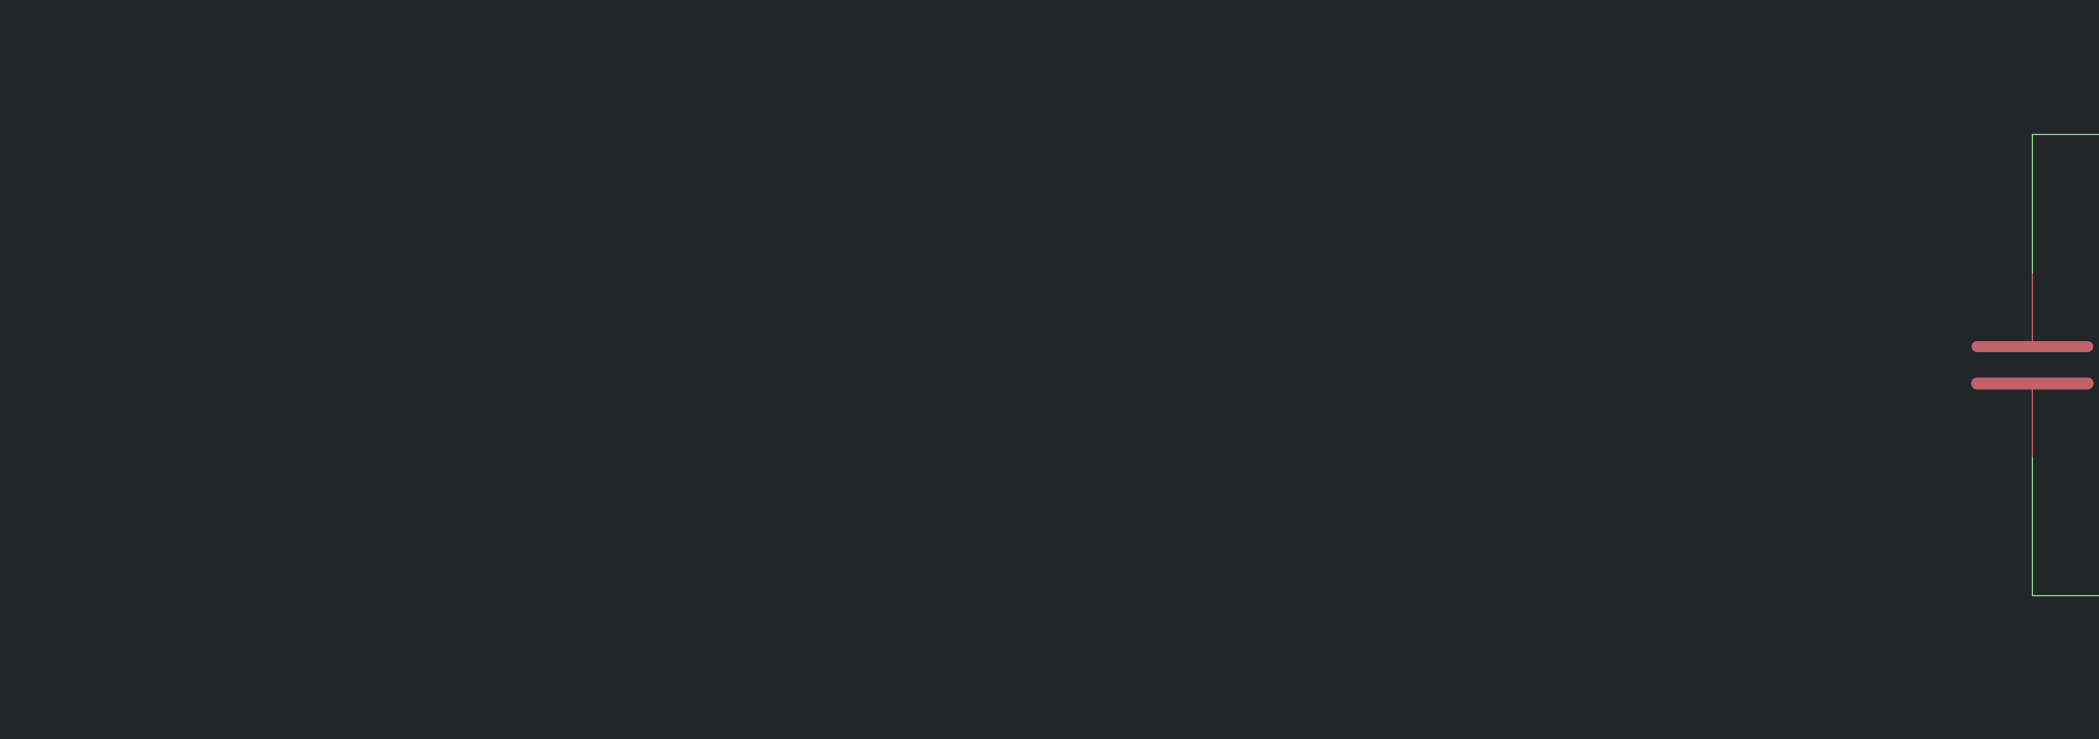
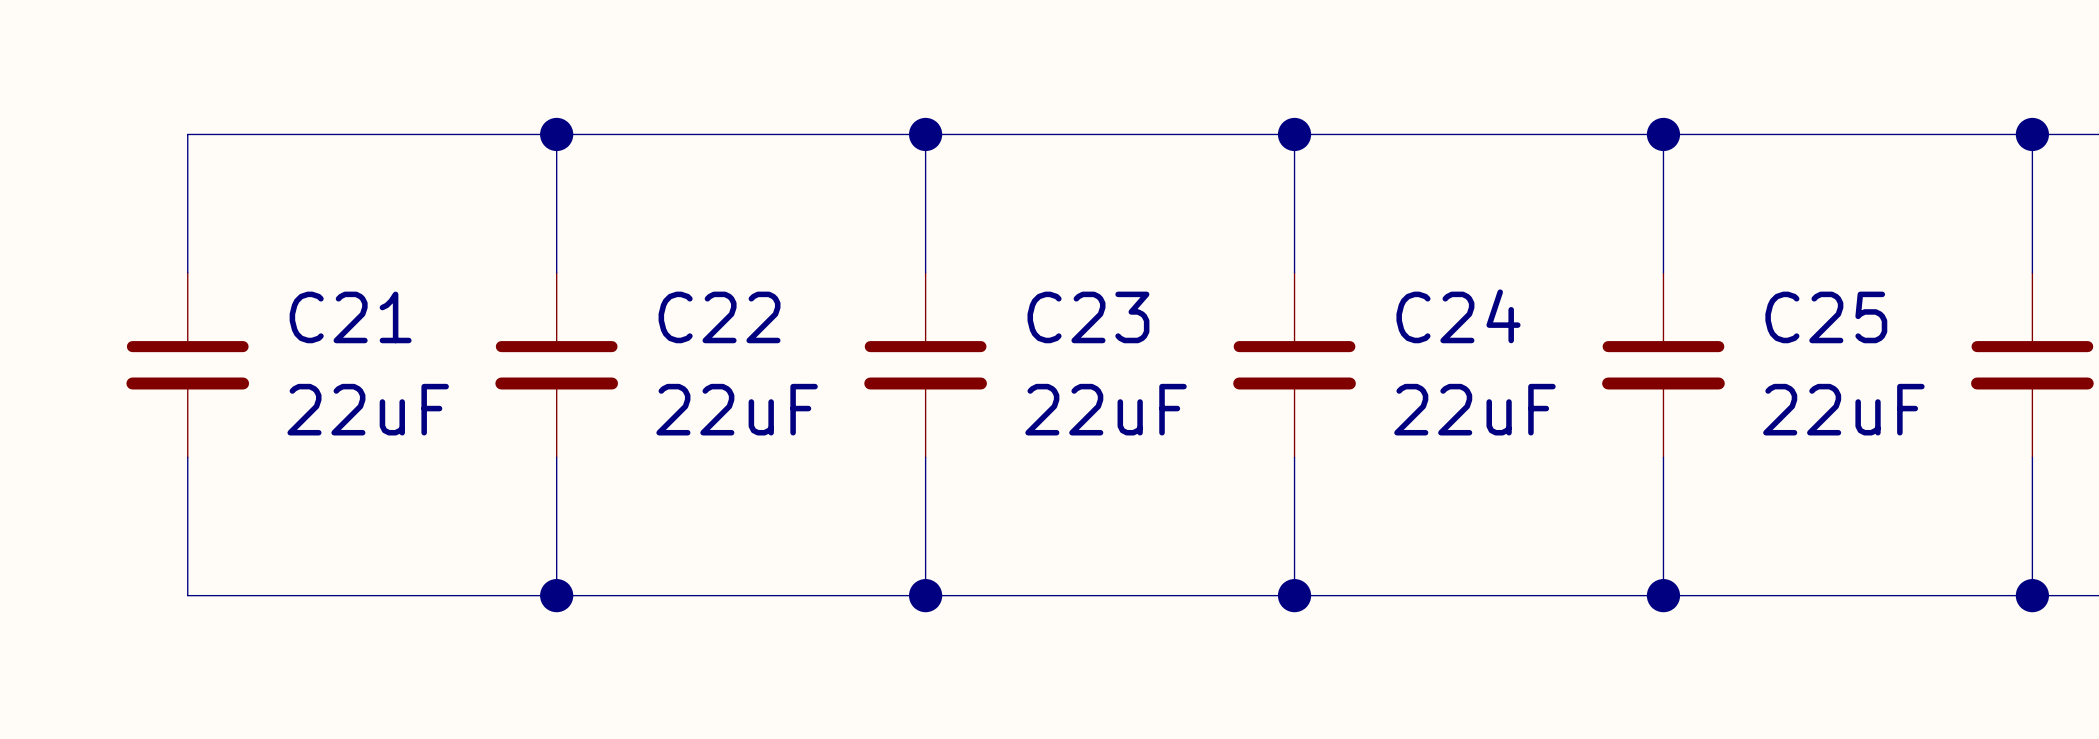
wire: none -> (556, 134) (556, 272)
junction: none -> (556, 134)
wire: none -> (925, 134) (925, 272)
junction: none -> (925, 134)
wire: none -> (1294, 134) (1294, 272)
junction: none -> (1294, 134)
wire: none -> (1663, 134) (1663, 272)
junction: none -> (1663, 134)
wire: none -> (2032, 134) (187, 134) (187, 272)
junction: none -> (2032, 134)
C21: none -> 22uF (187, 365)
C22: none -> 22uF (556, 365)
C23: none -> 22uF (925, 365)
C24: none -> 22uF (1294, 365)
C25: none -> 22uF (1663, 365)
wire: none -> (187, 457) (187, 595) (2032, 595)
wire: none -> (556, 457) (556, 595)
wire: none -> (925, 457) (925, 595)
wire: none -> (1294, 457) (1294, 595)
wire: none -> (1663, 457) (1663, 595)
junction: none -> (556, 595)
junction: none -> (925, 595)
junction: none -> (1294, 595)
junction: none -> (1663, 595)
junction: none -> (2032, 595)

